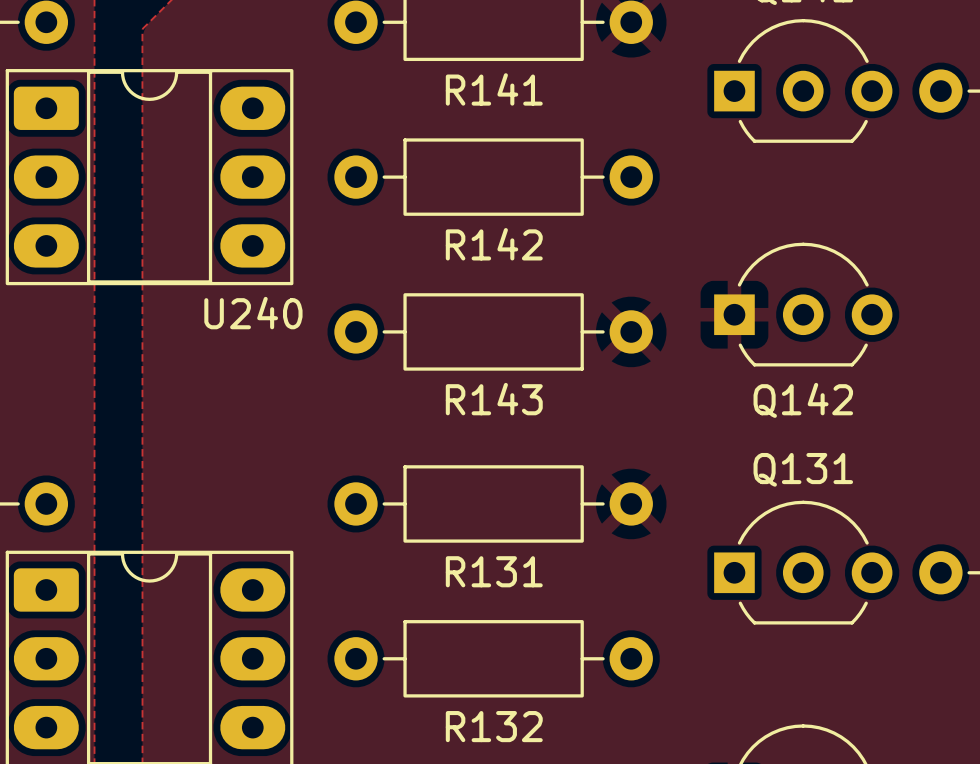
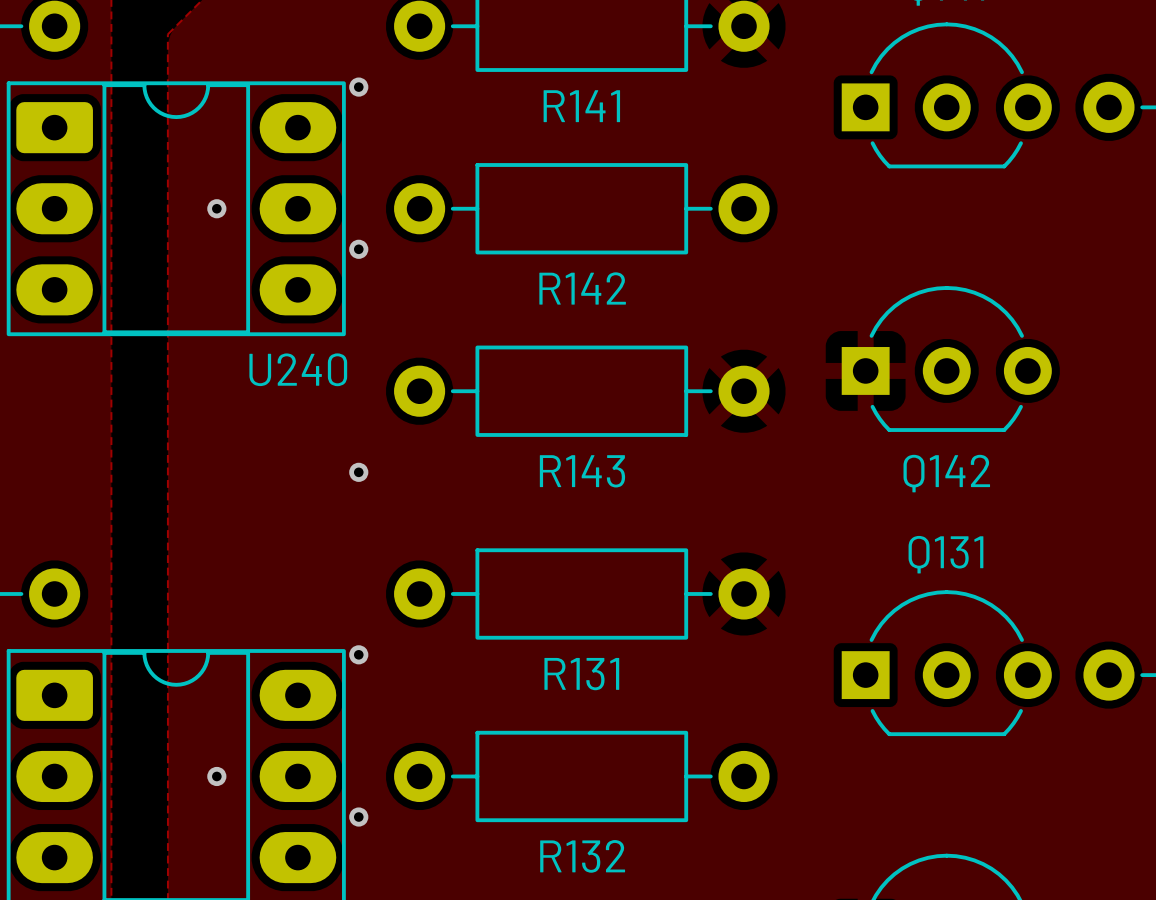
via: none -> (358, 87)
via: none -> (216, 208)
via: none -> (358, 249)
via: none -> (358, 472)
via: none -> (358, 654)
via: none -> (216, 776)
via: none -> (358, 817)

